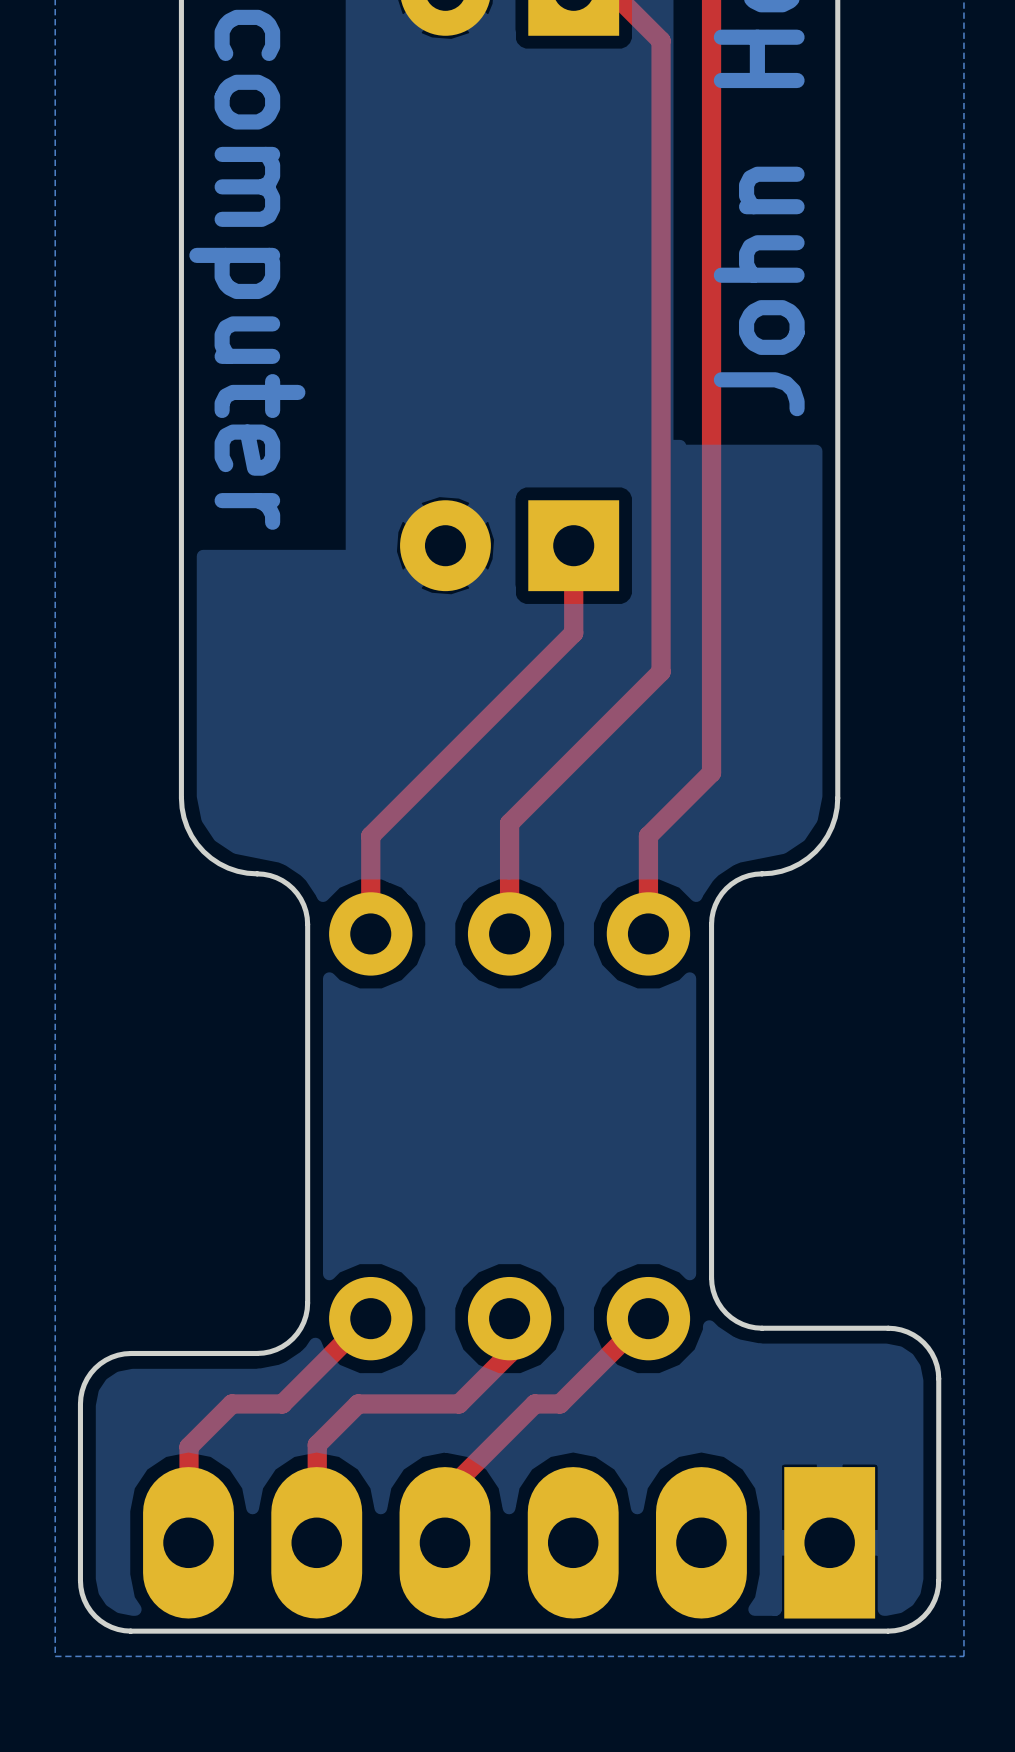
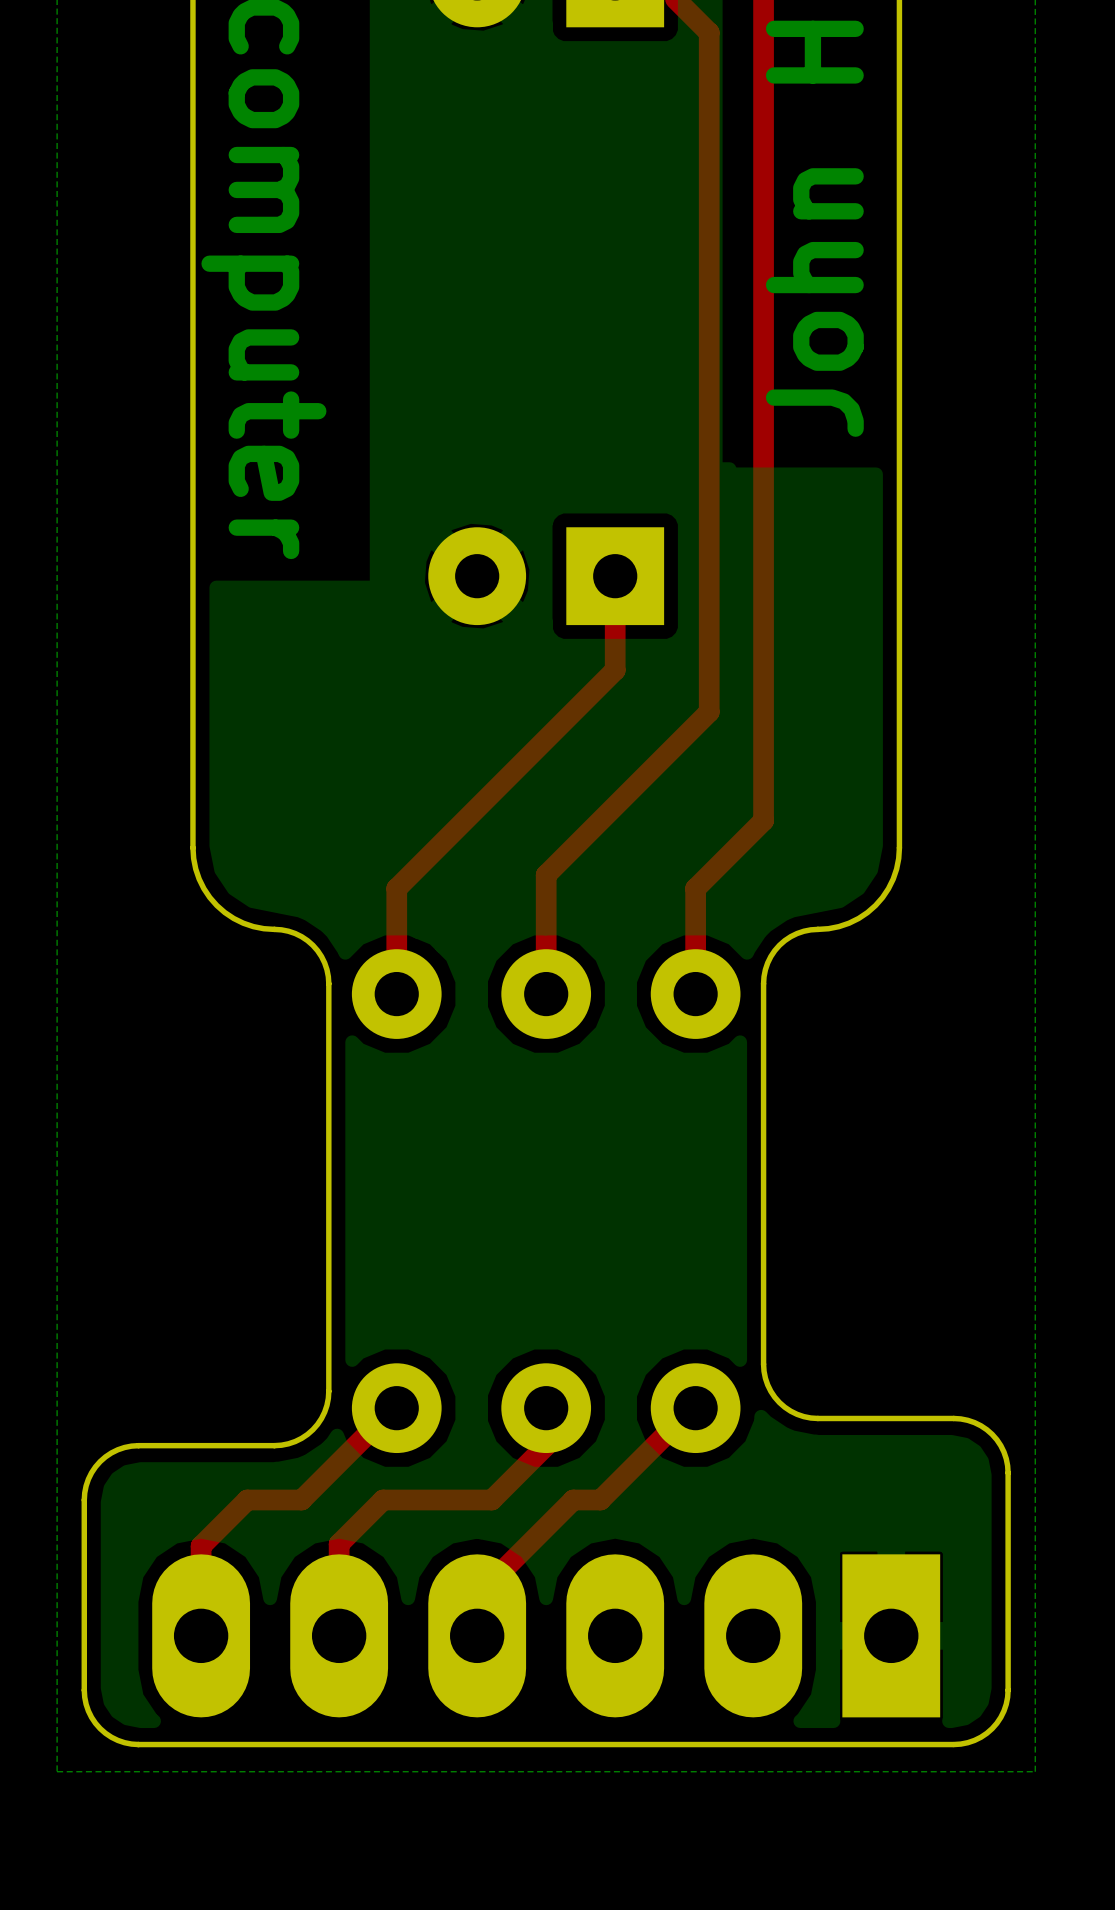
part position: (509, 1542) -> (546, 1635)

